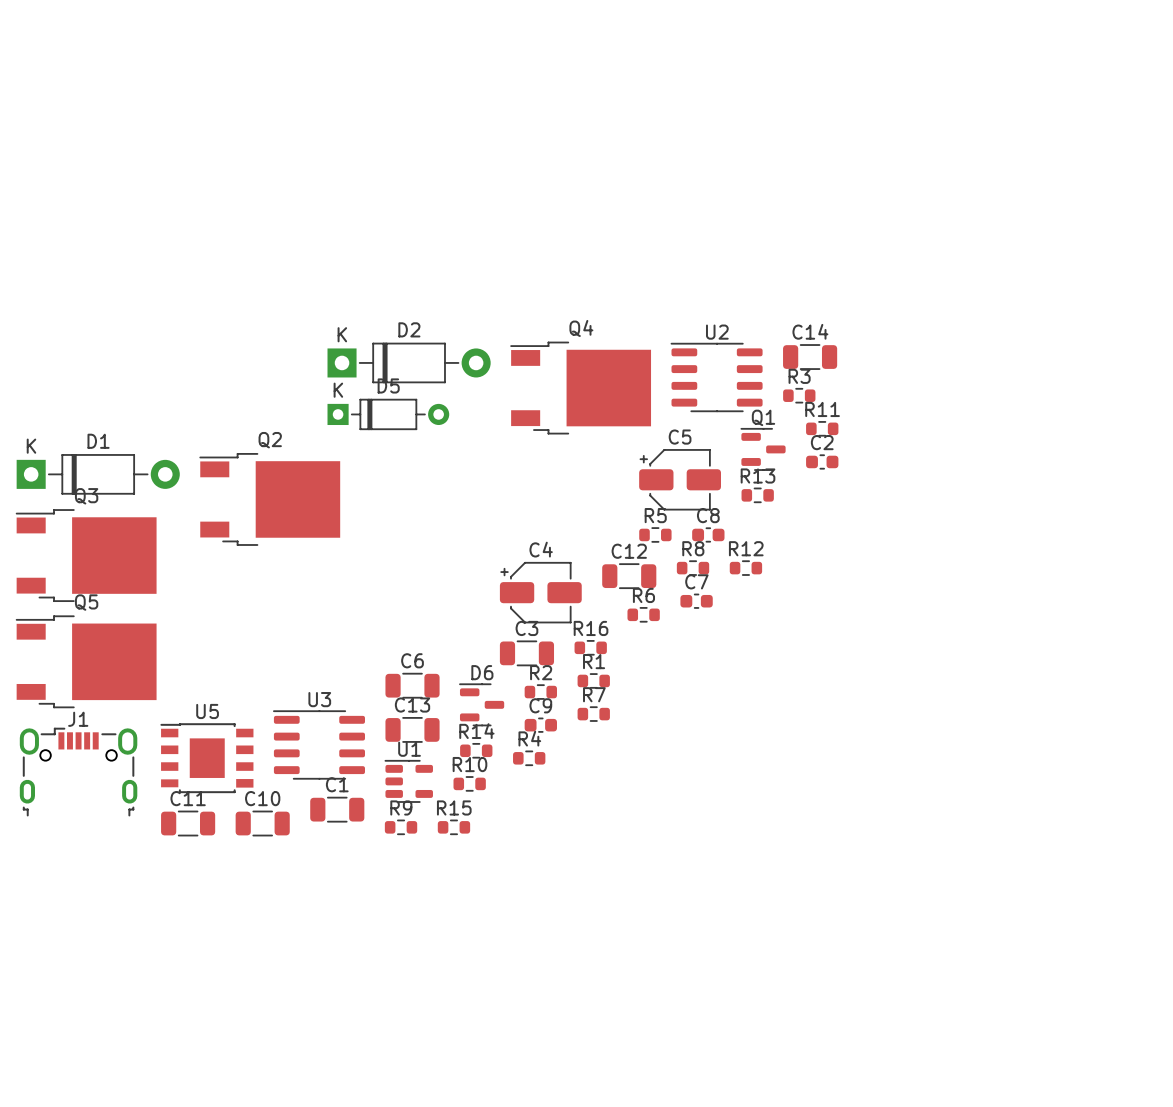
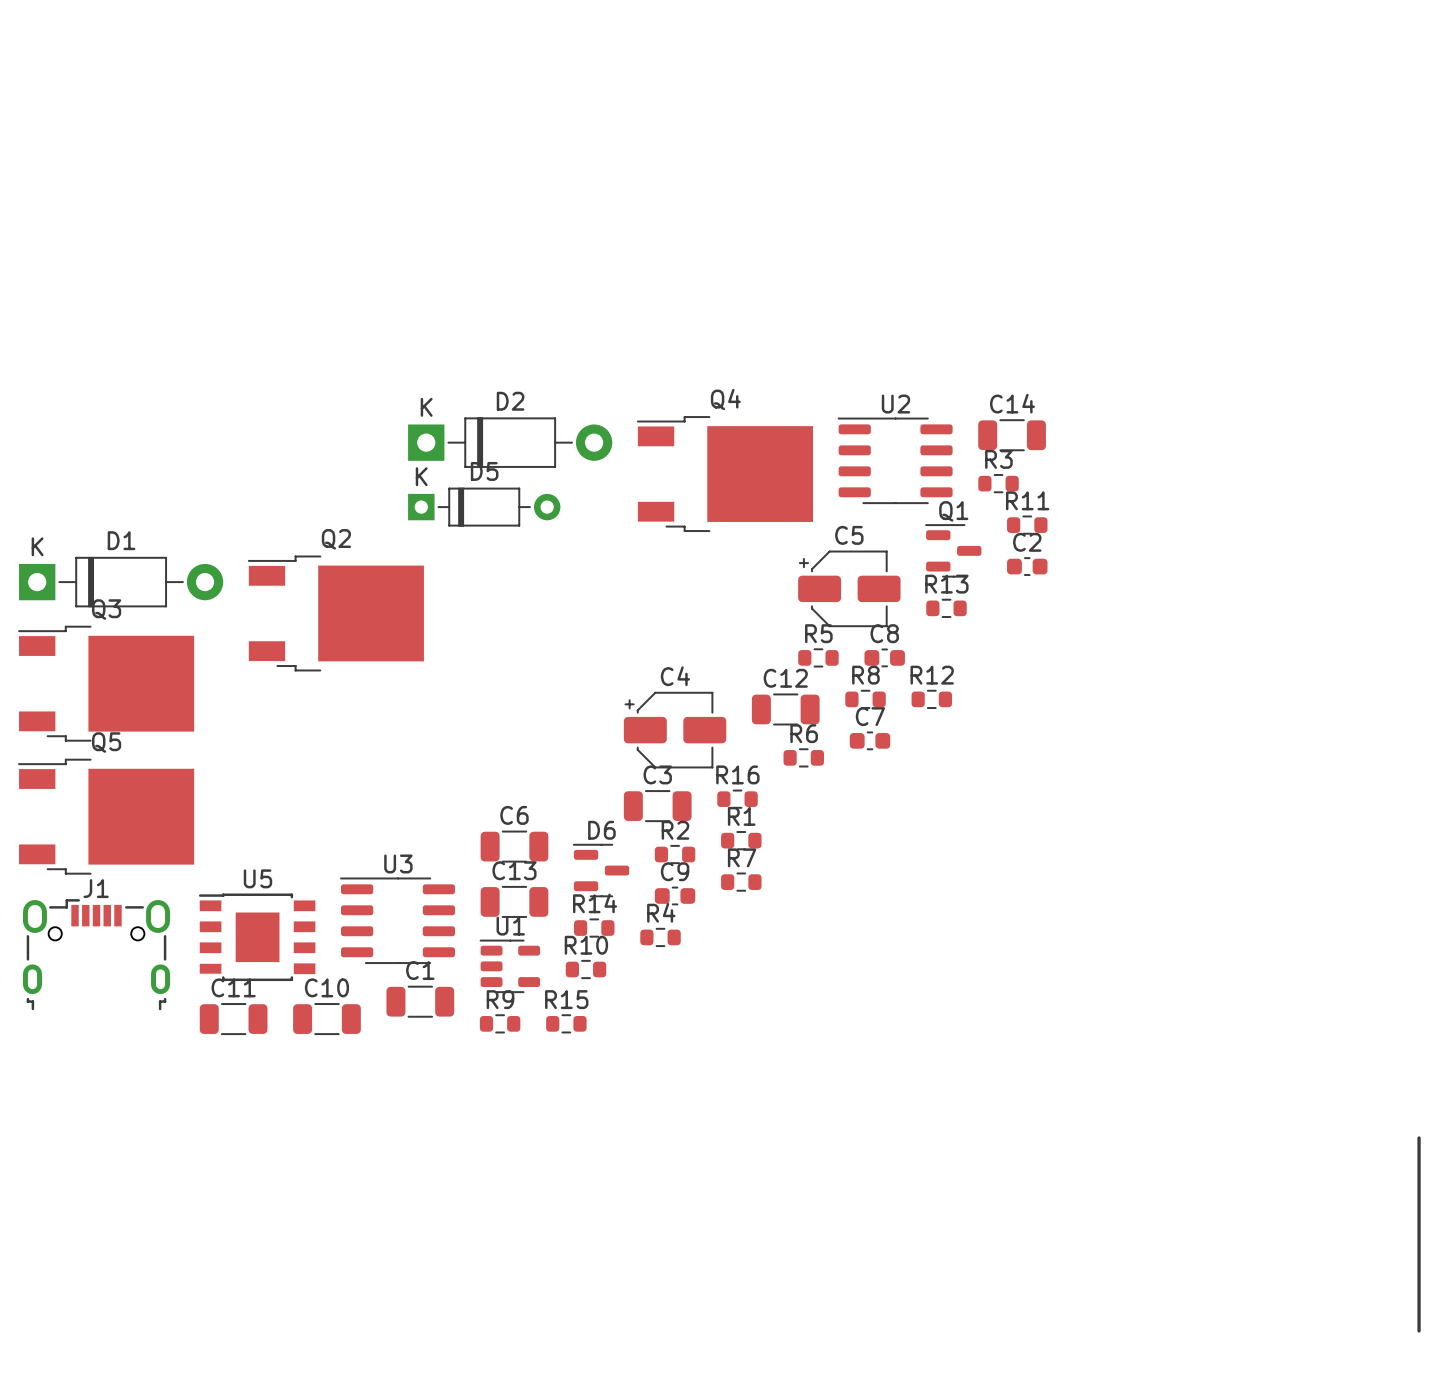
line: none -> (1419, 1137) (1419, 1330)

